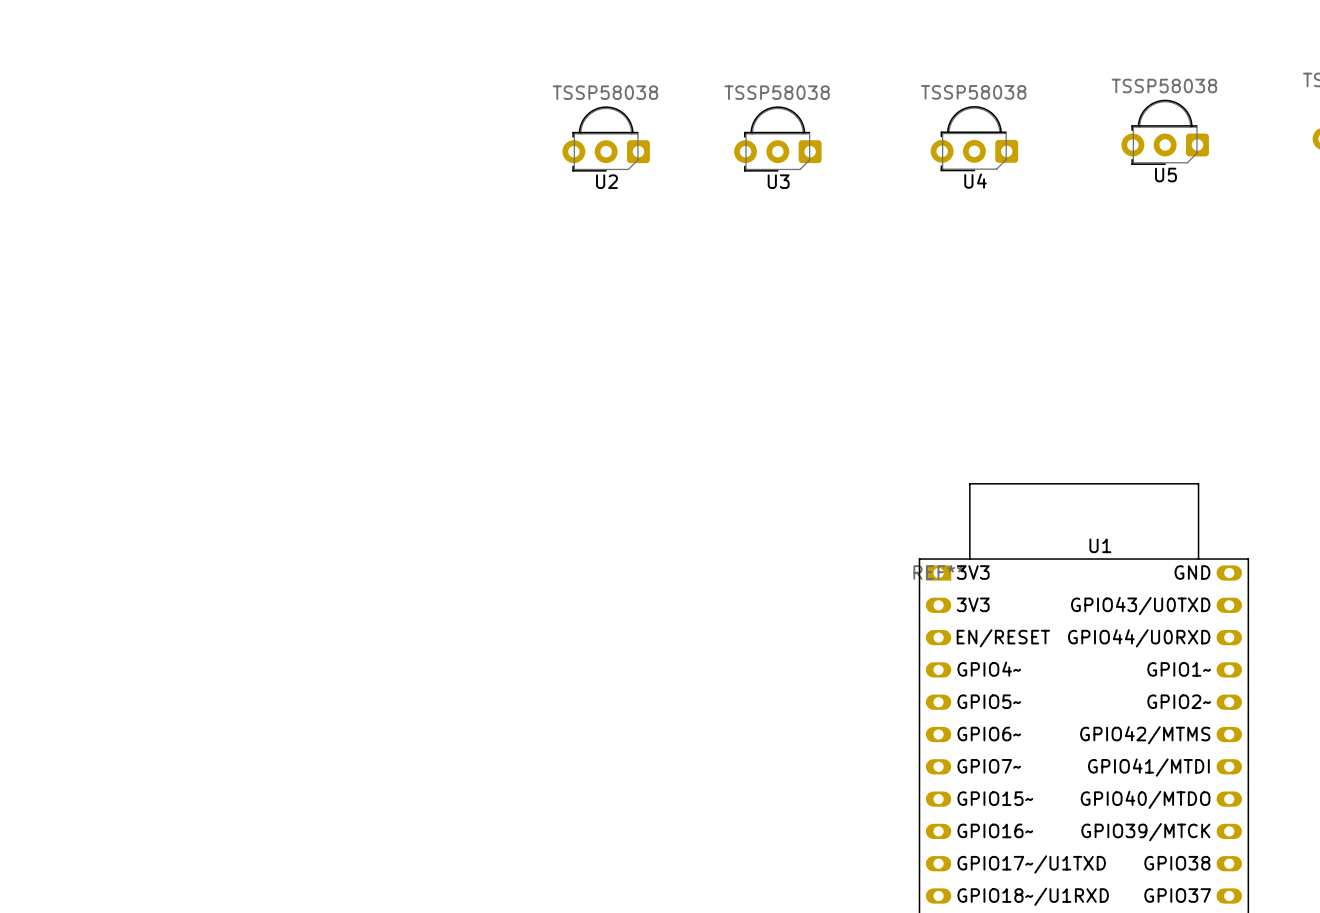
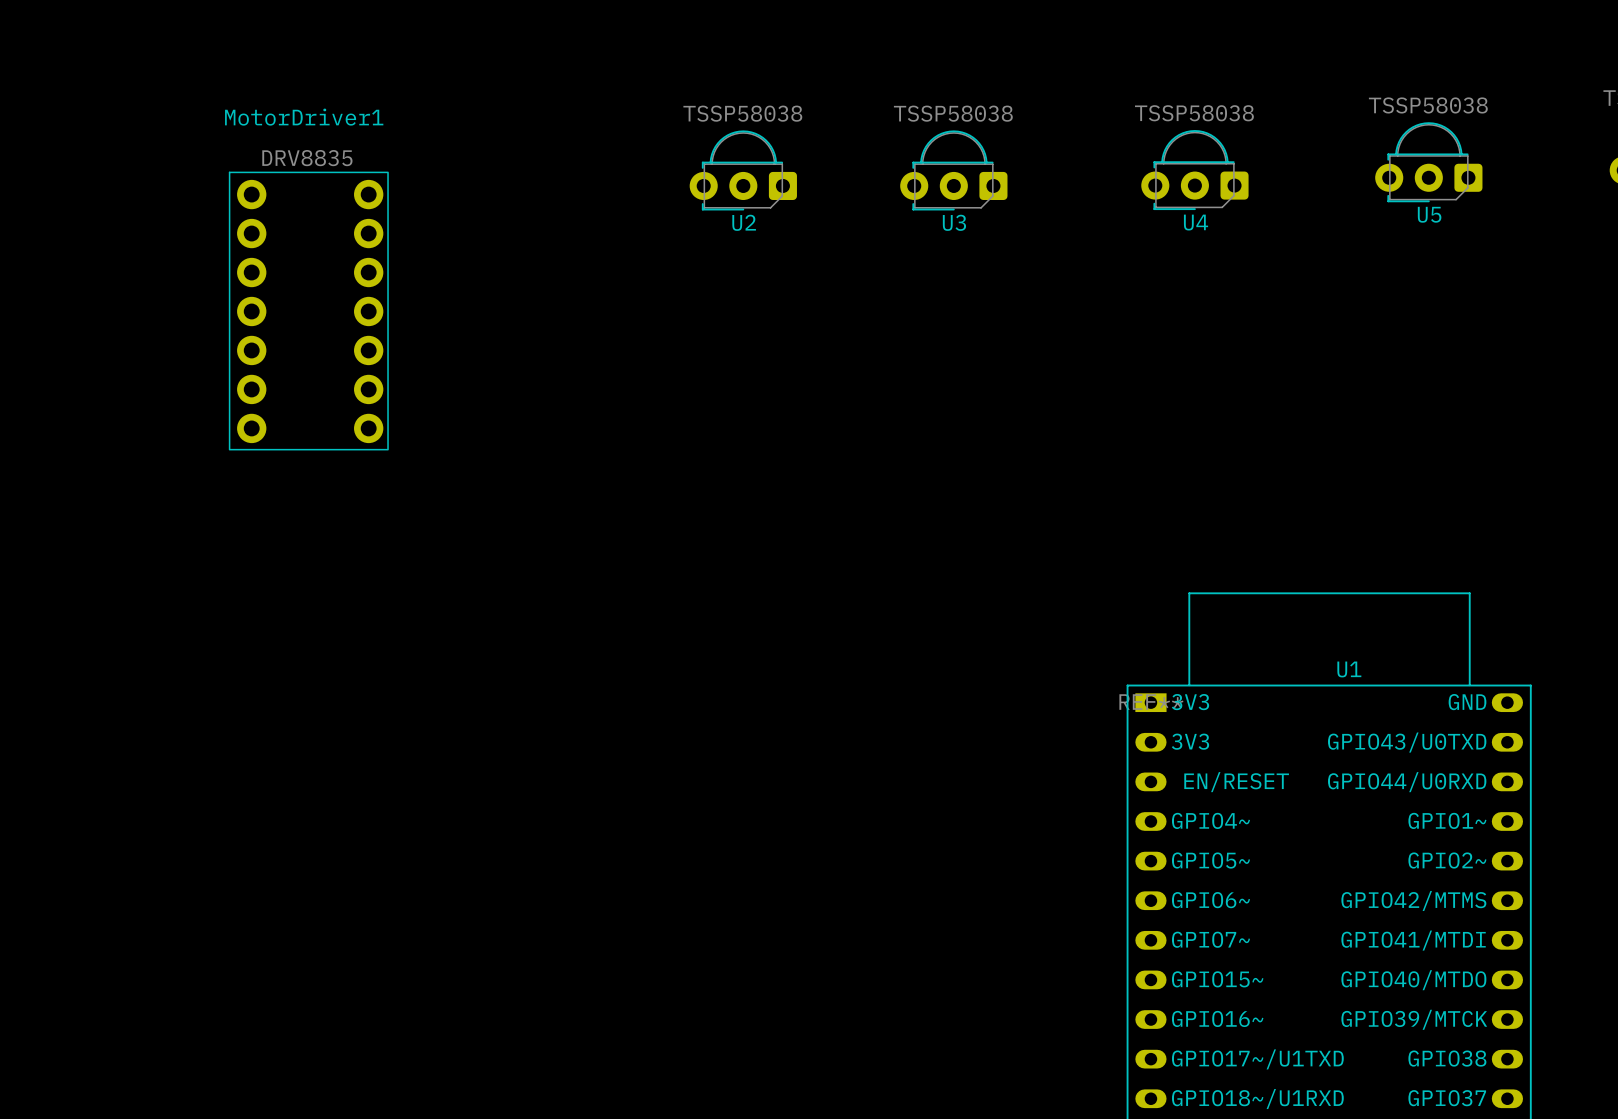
MotorDriver1: none -> DRV8835 (308, 311)

